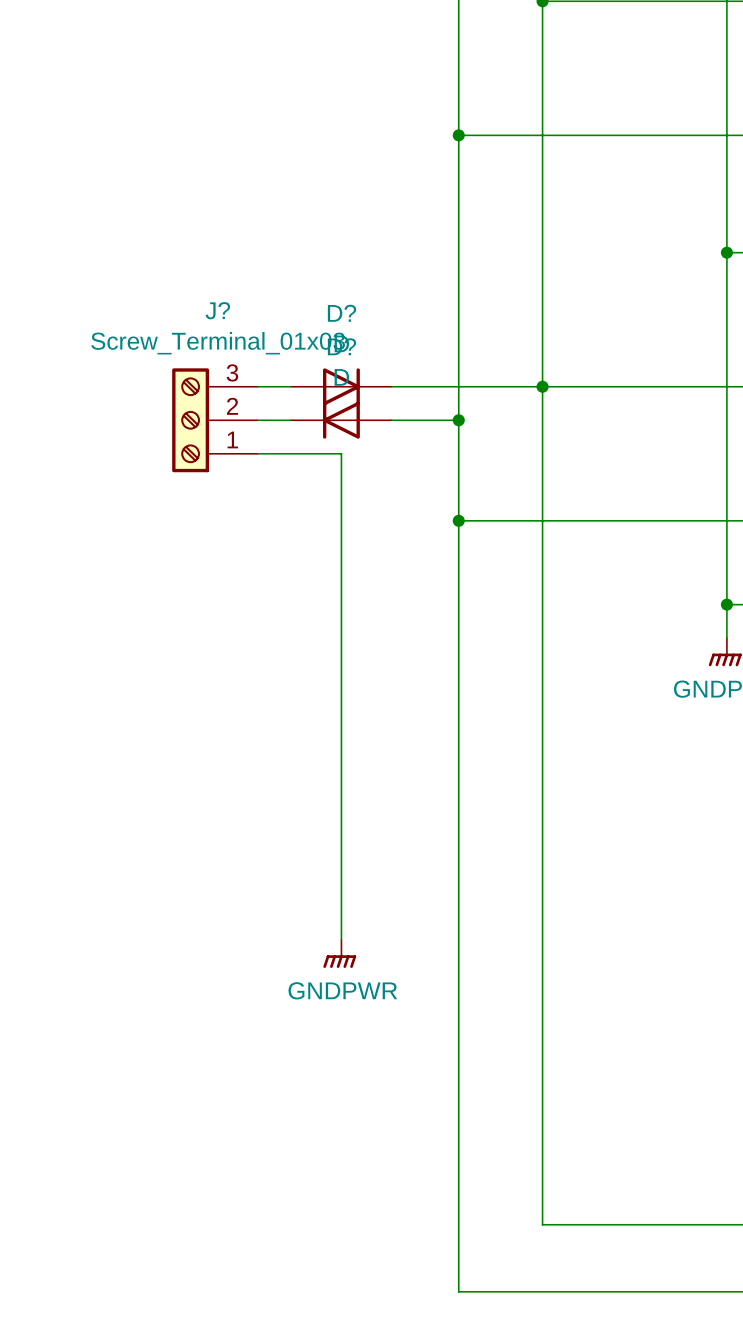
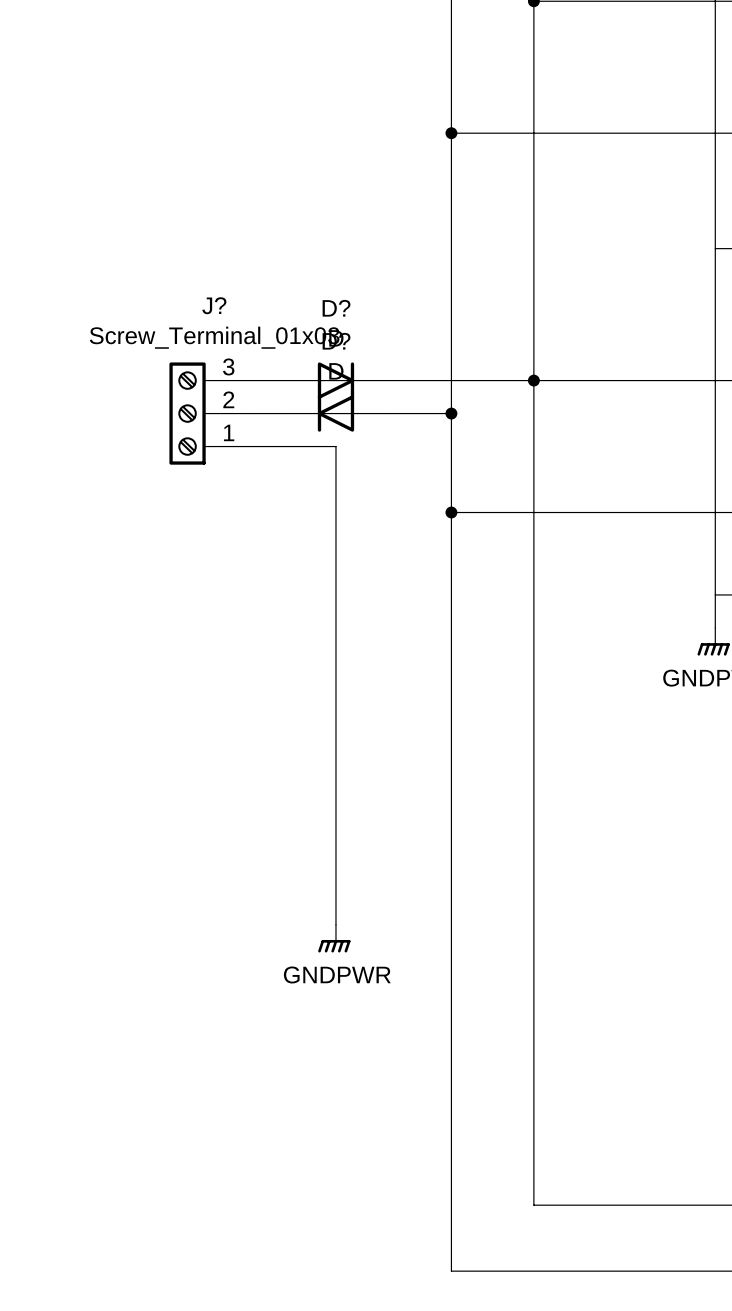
junction: (726, 252) -> none
junction: (726, 604) -> none

